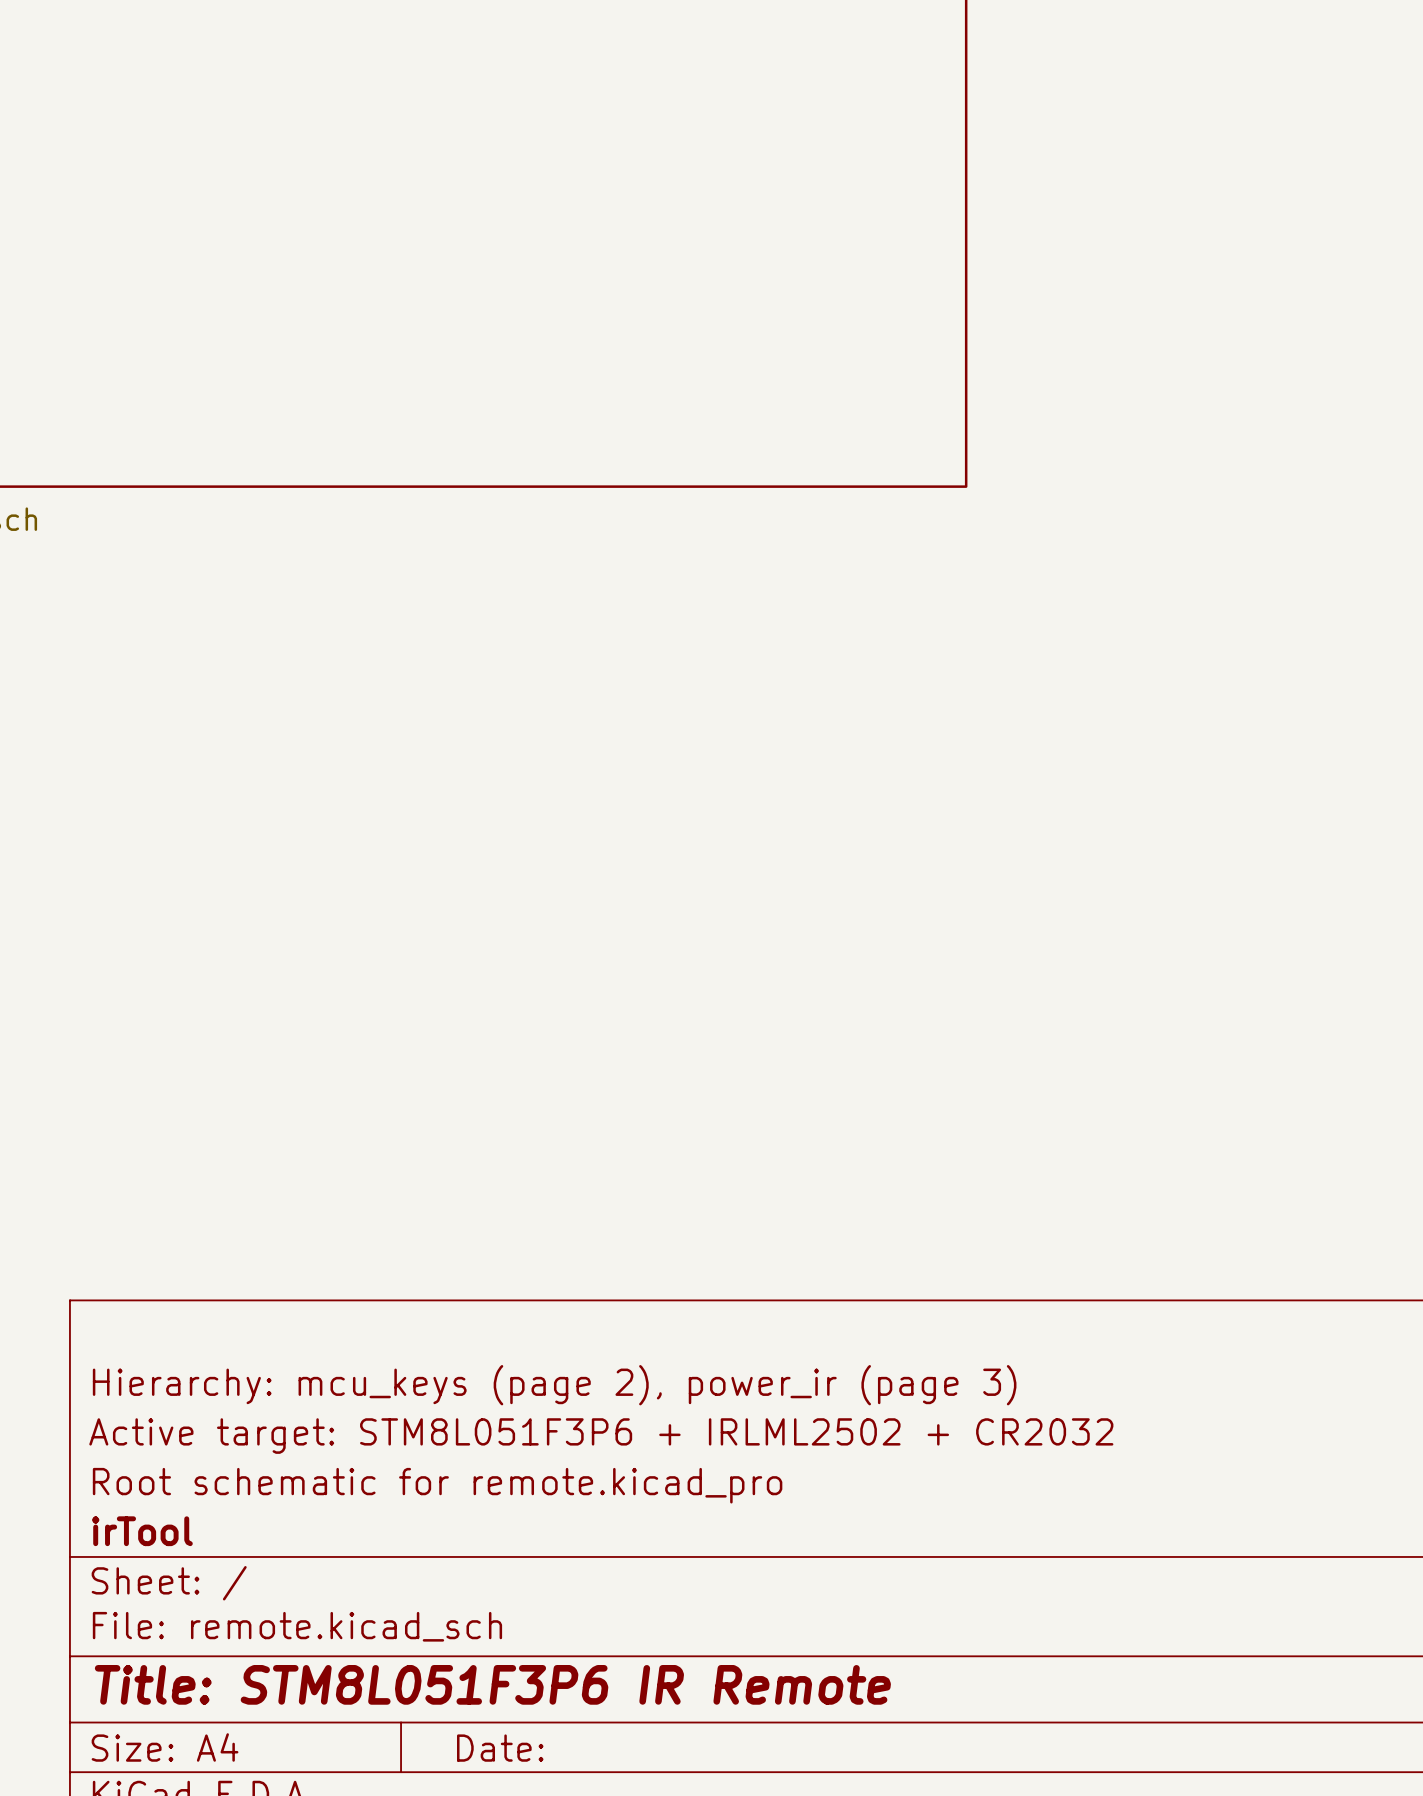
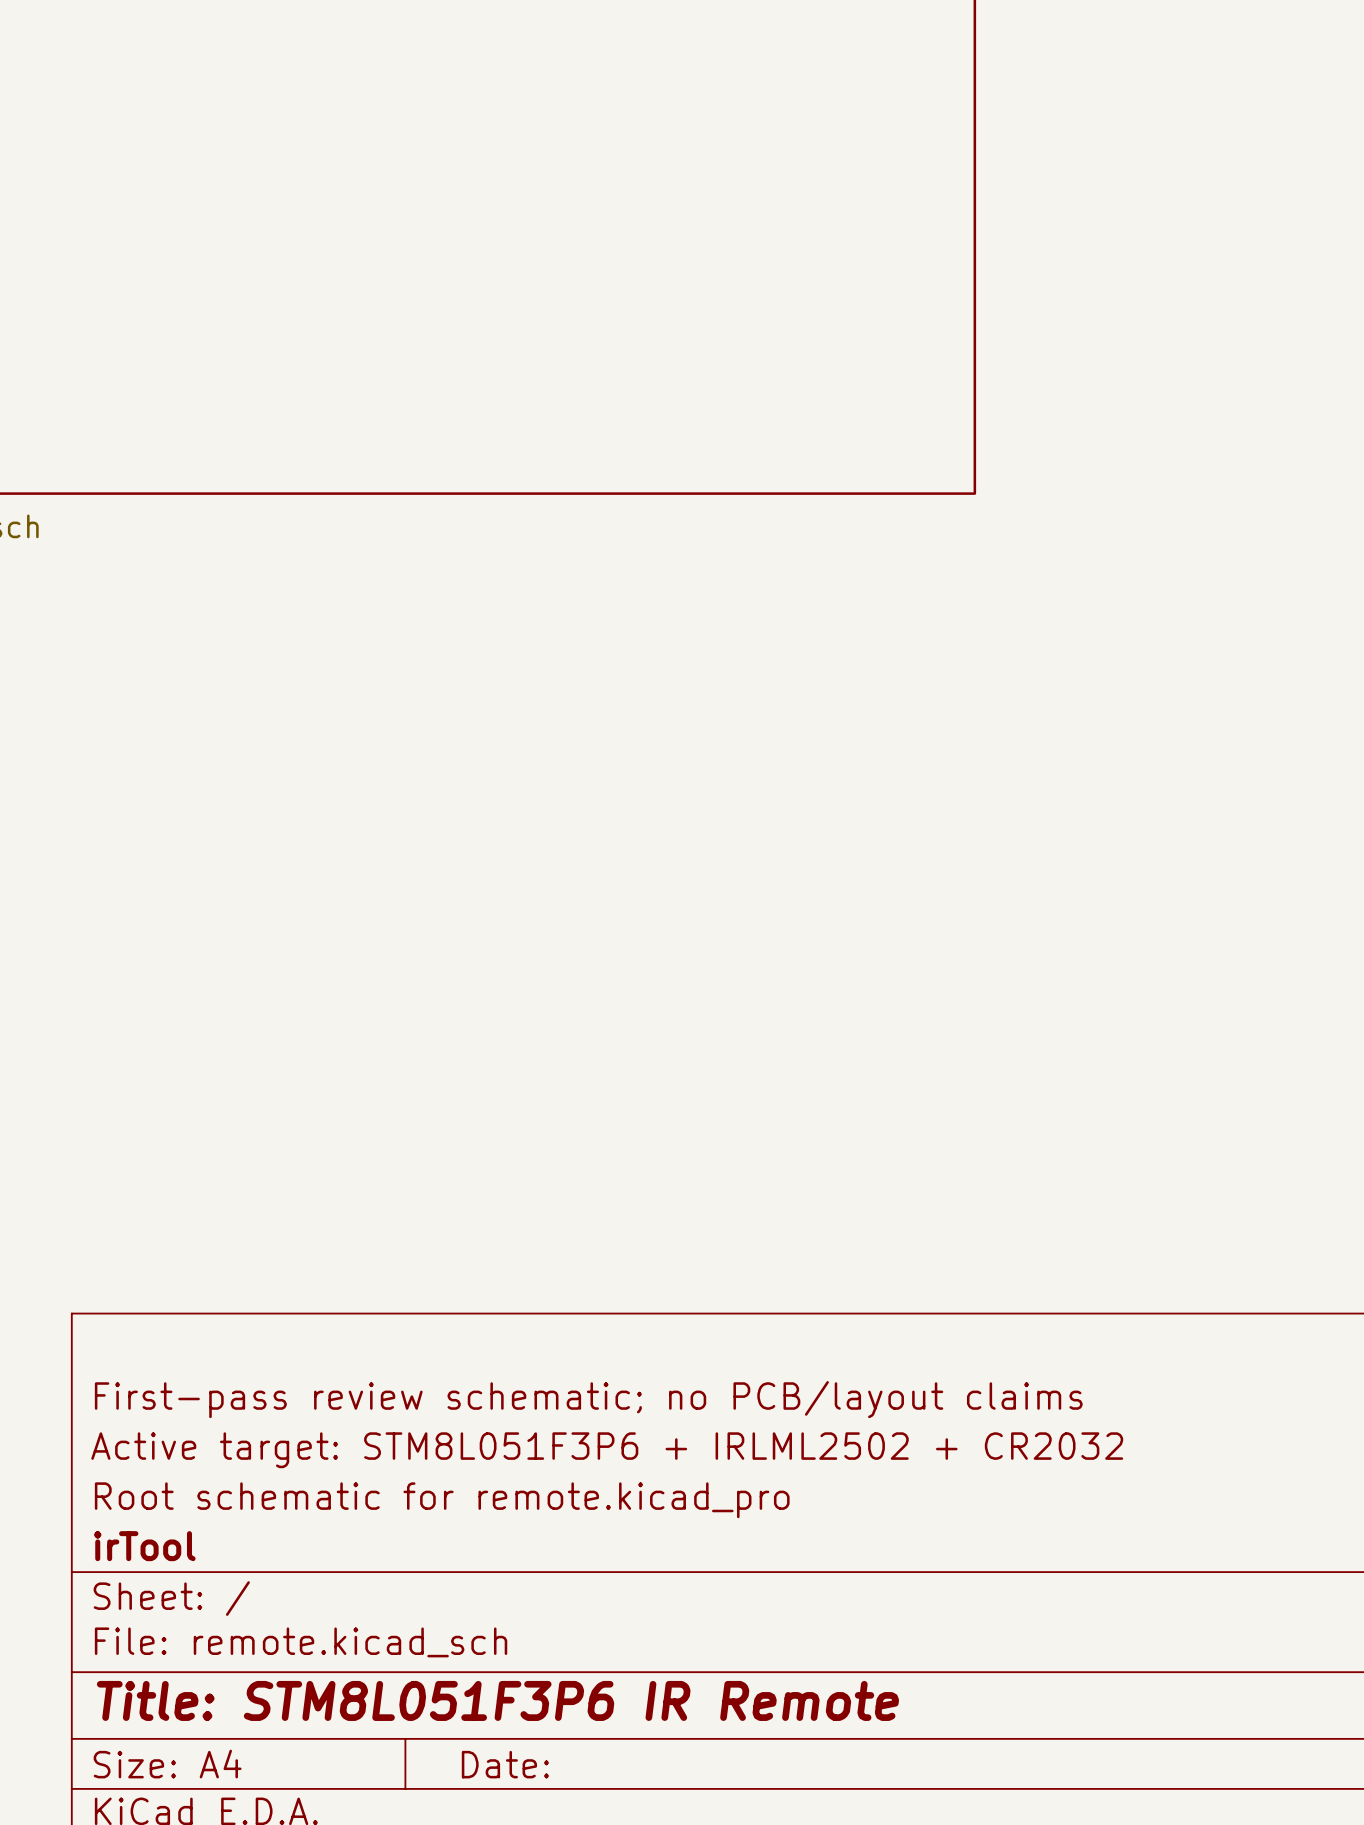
title block: Hierarchy: mcu_keys (page 2), power_ir (page 3) (554, 1385) -> First-pass review schematic; no PCB/layout claims (588, 1399)

